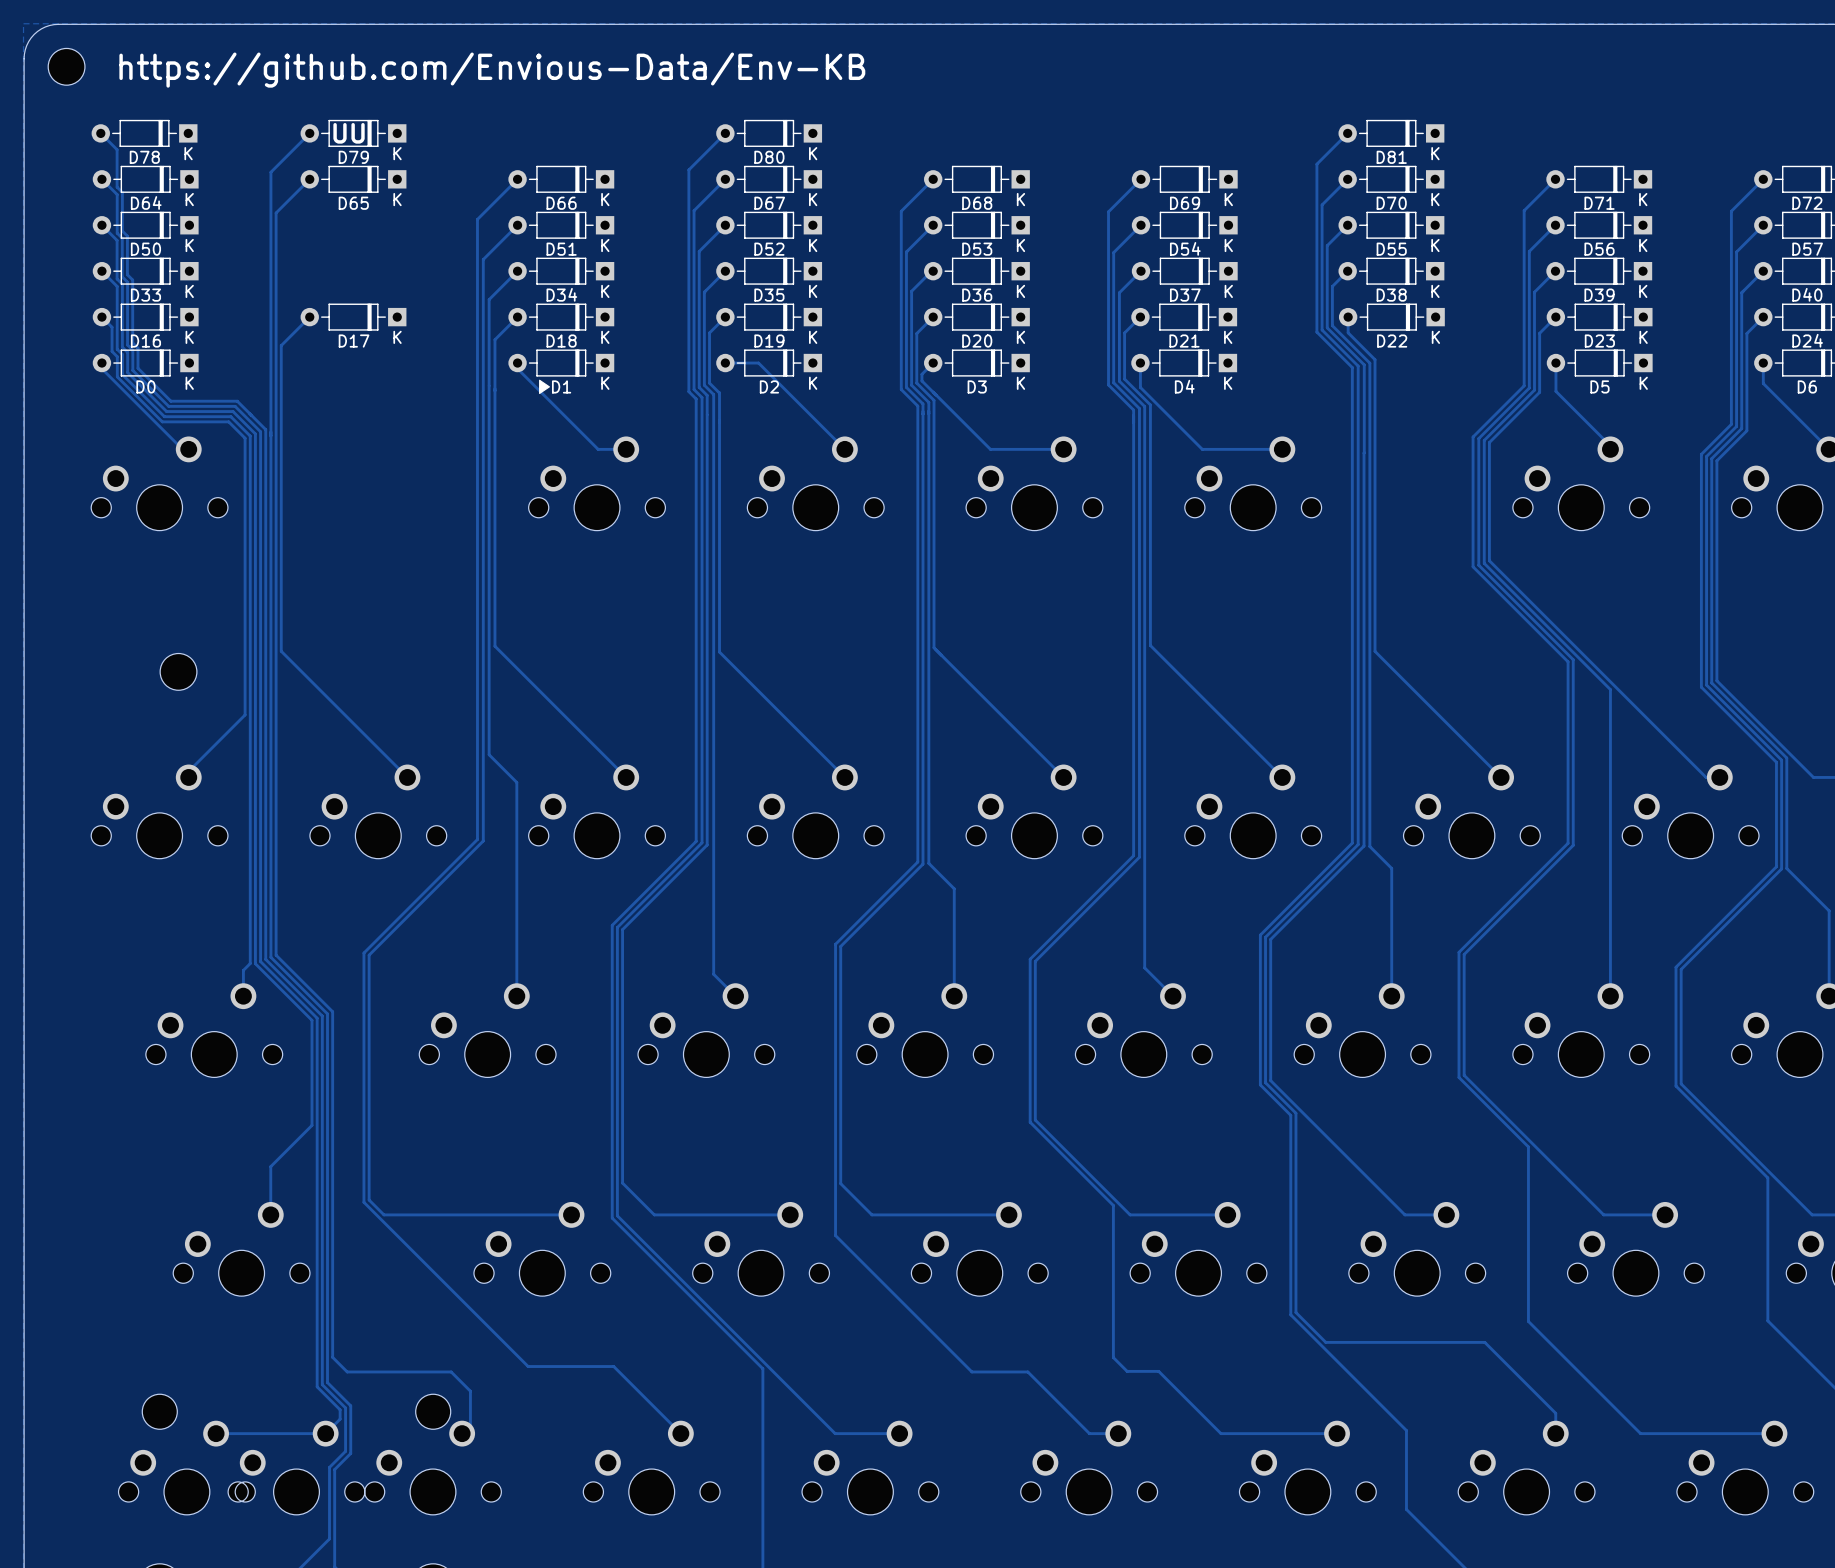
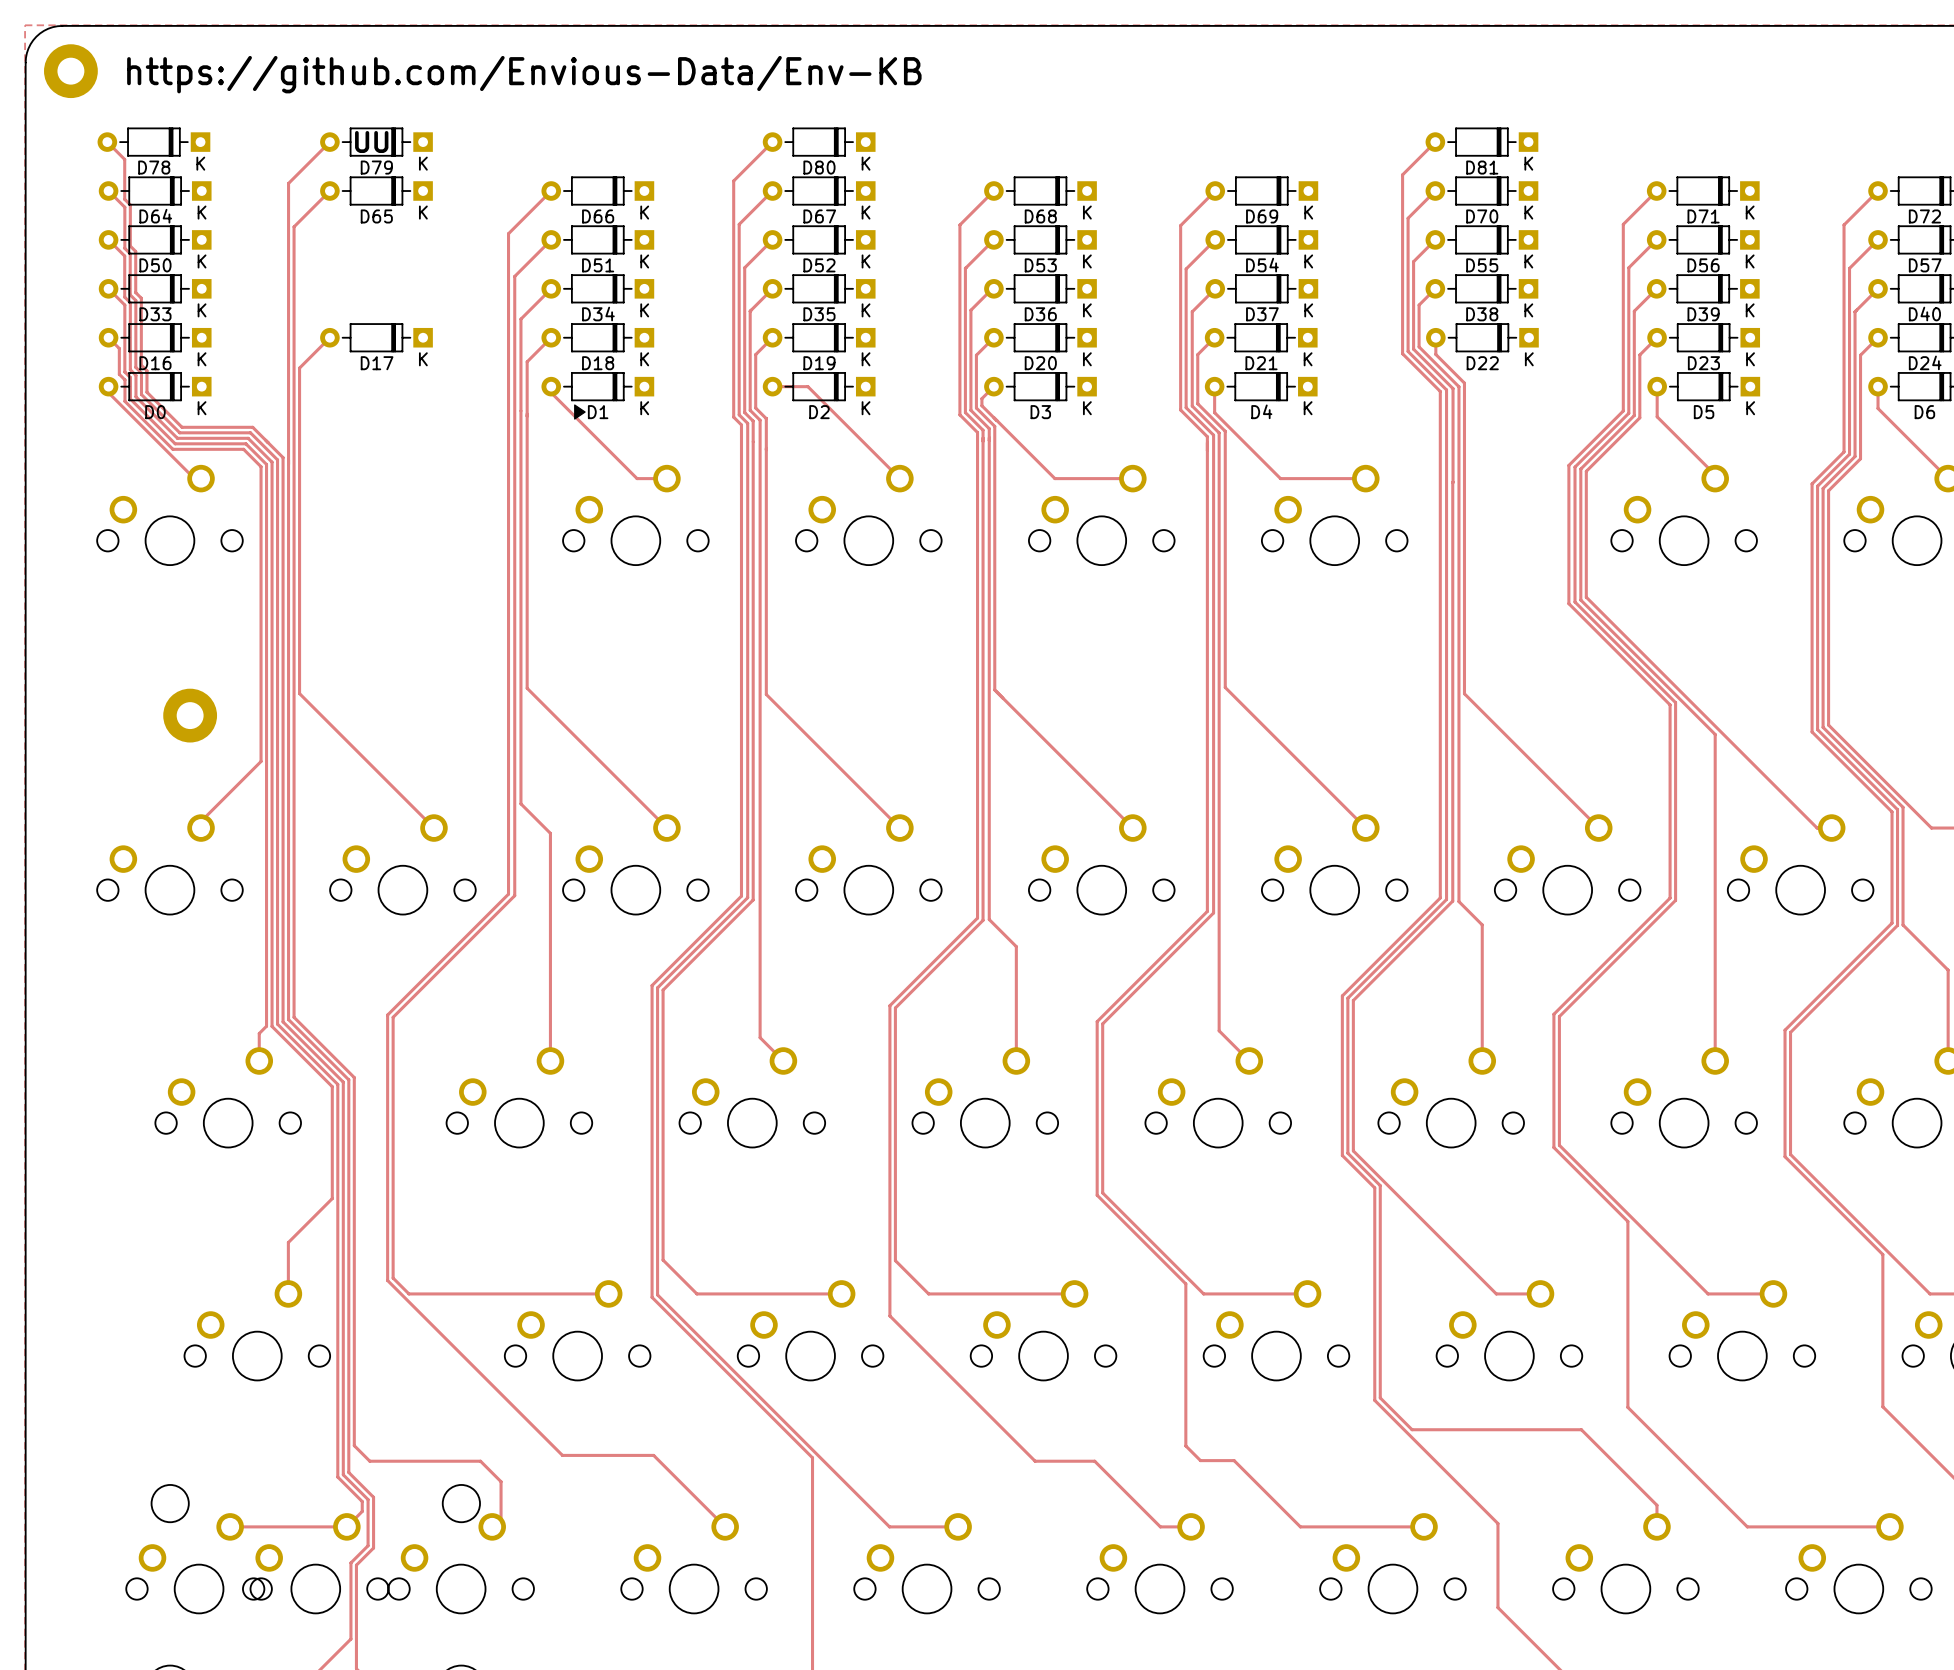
part footprint: [48, 48, 85, 86] -> [44, 44, 98, 99]
part footprint: [160, 653, 197, 691] -> [163, 688, 218, 743]

